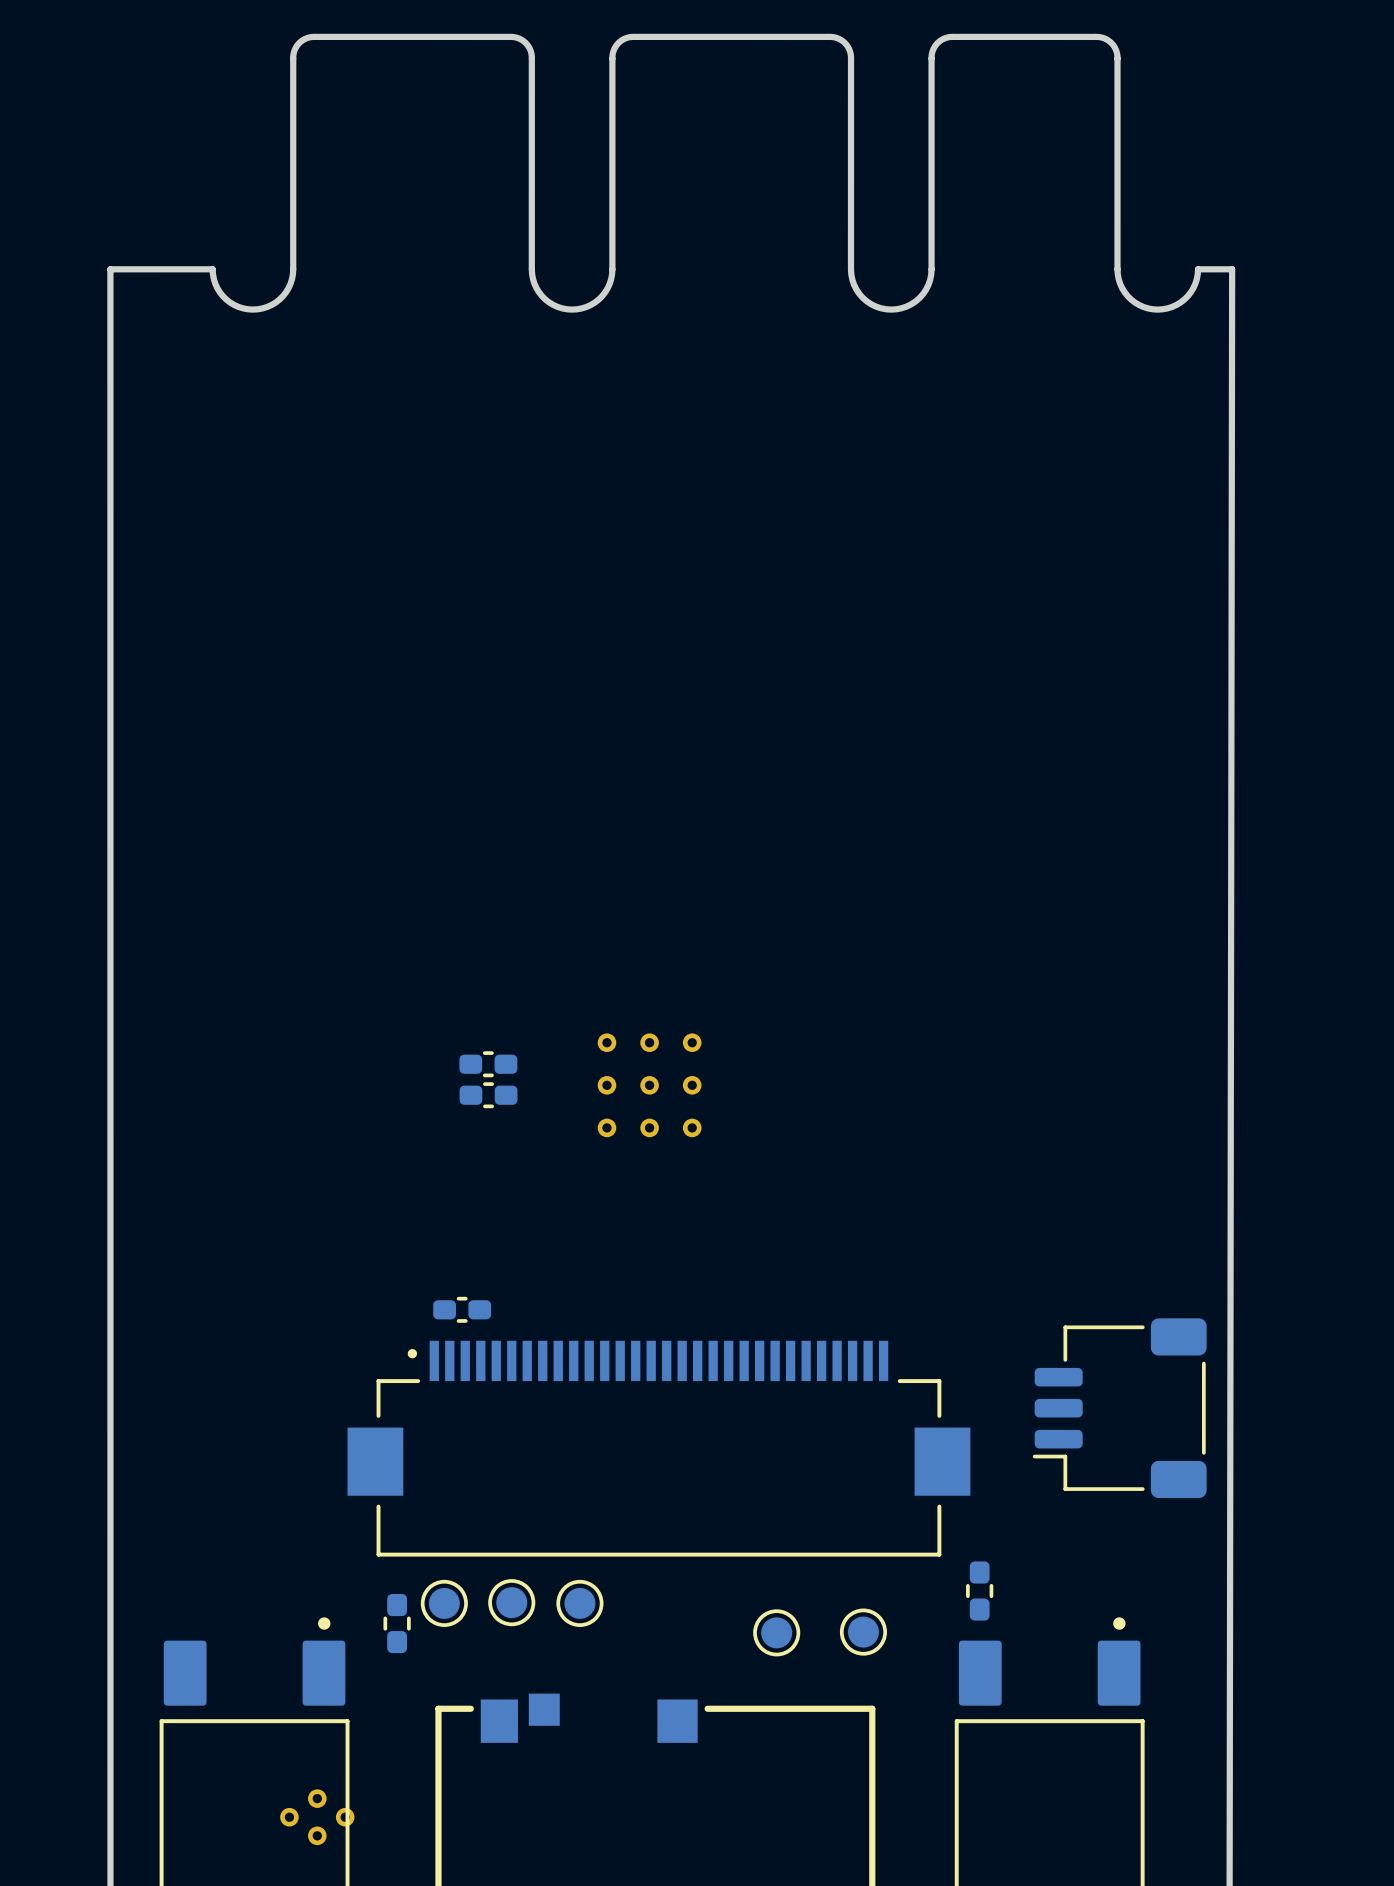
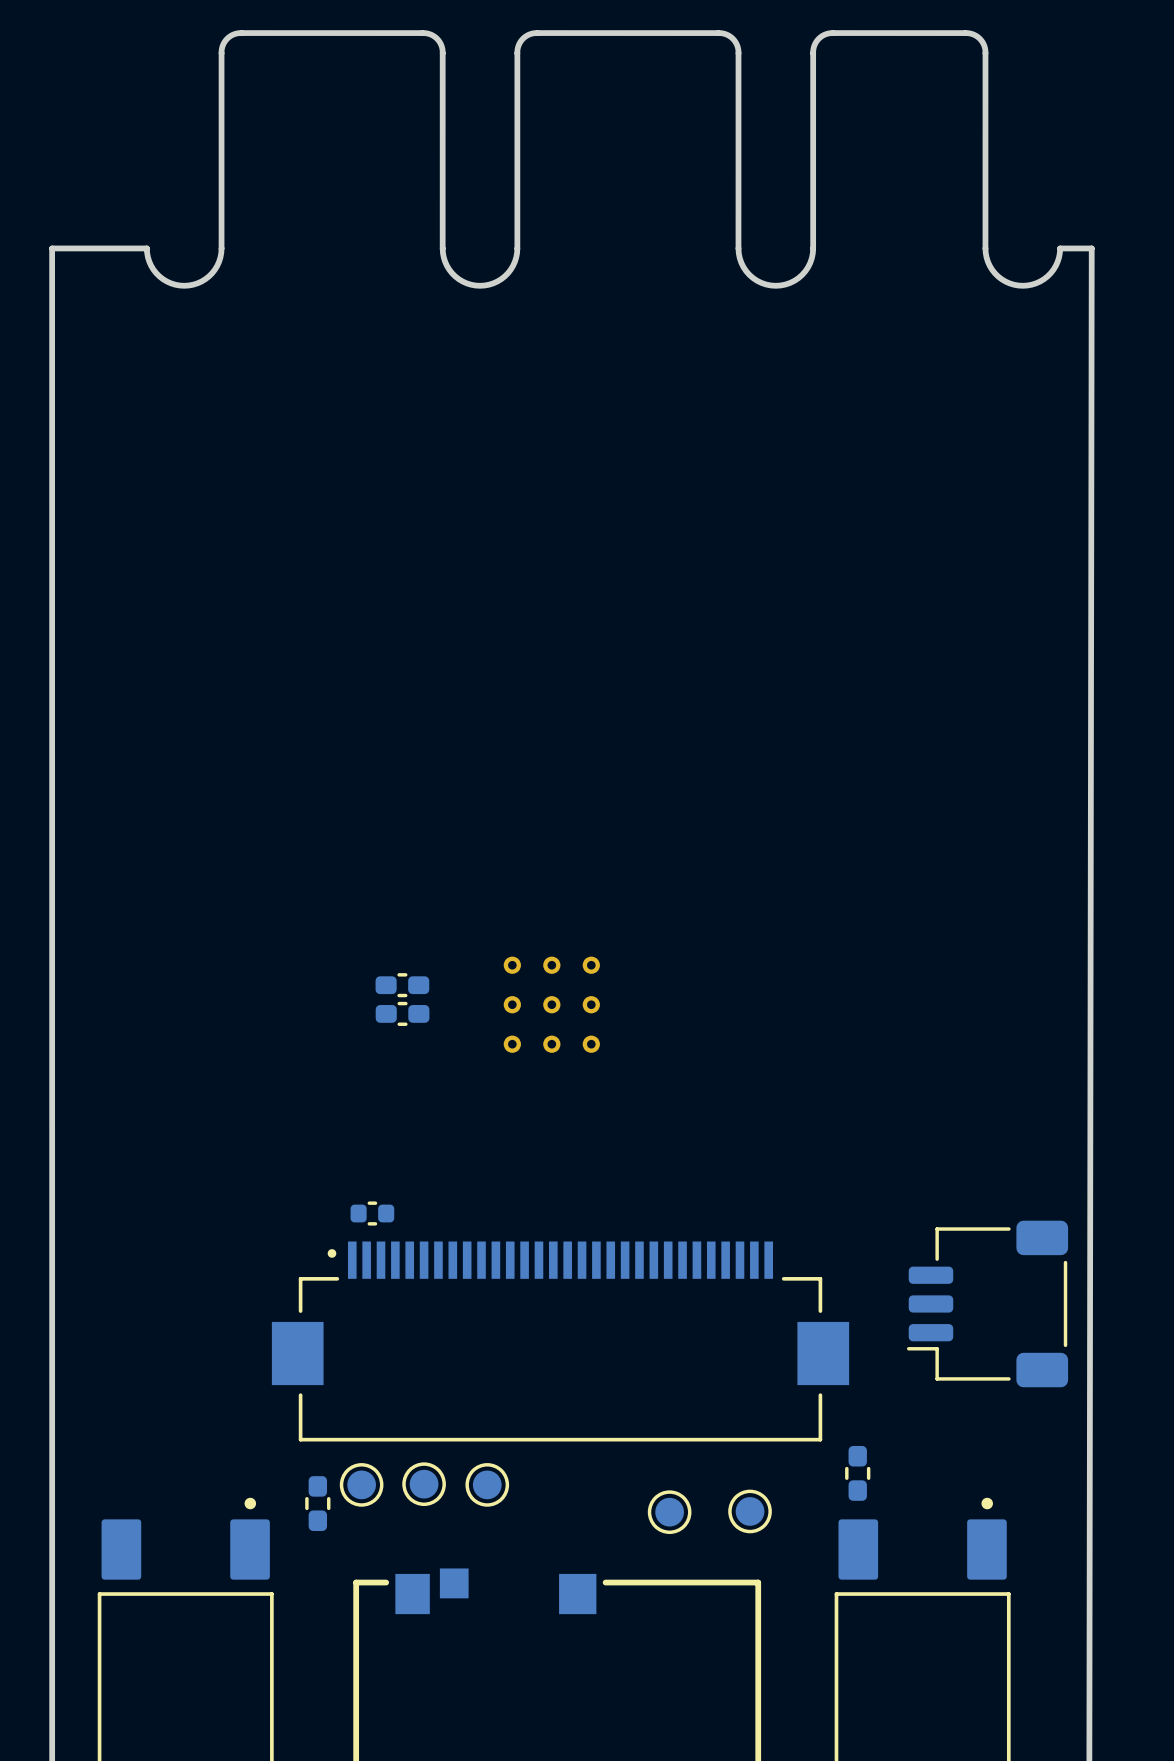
part footprint: [433, 1296, 492, 1323] -> [350, 1201, 395, 1226]
part: (317, 1817) -> none

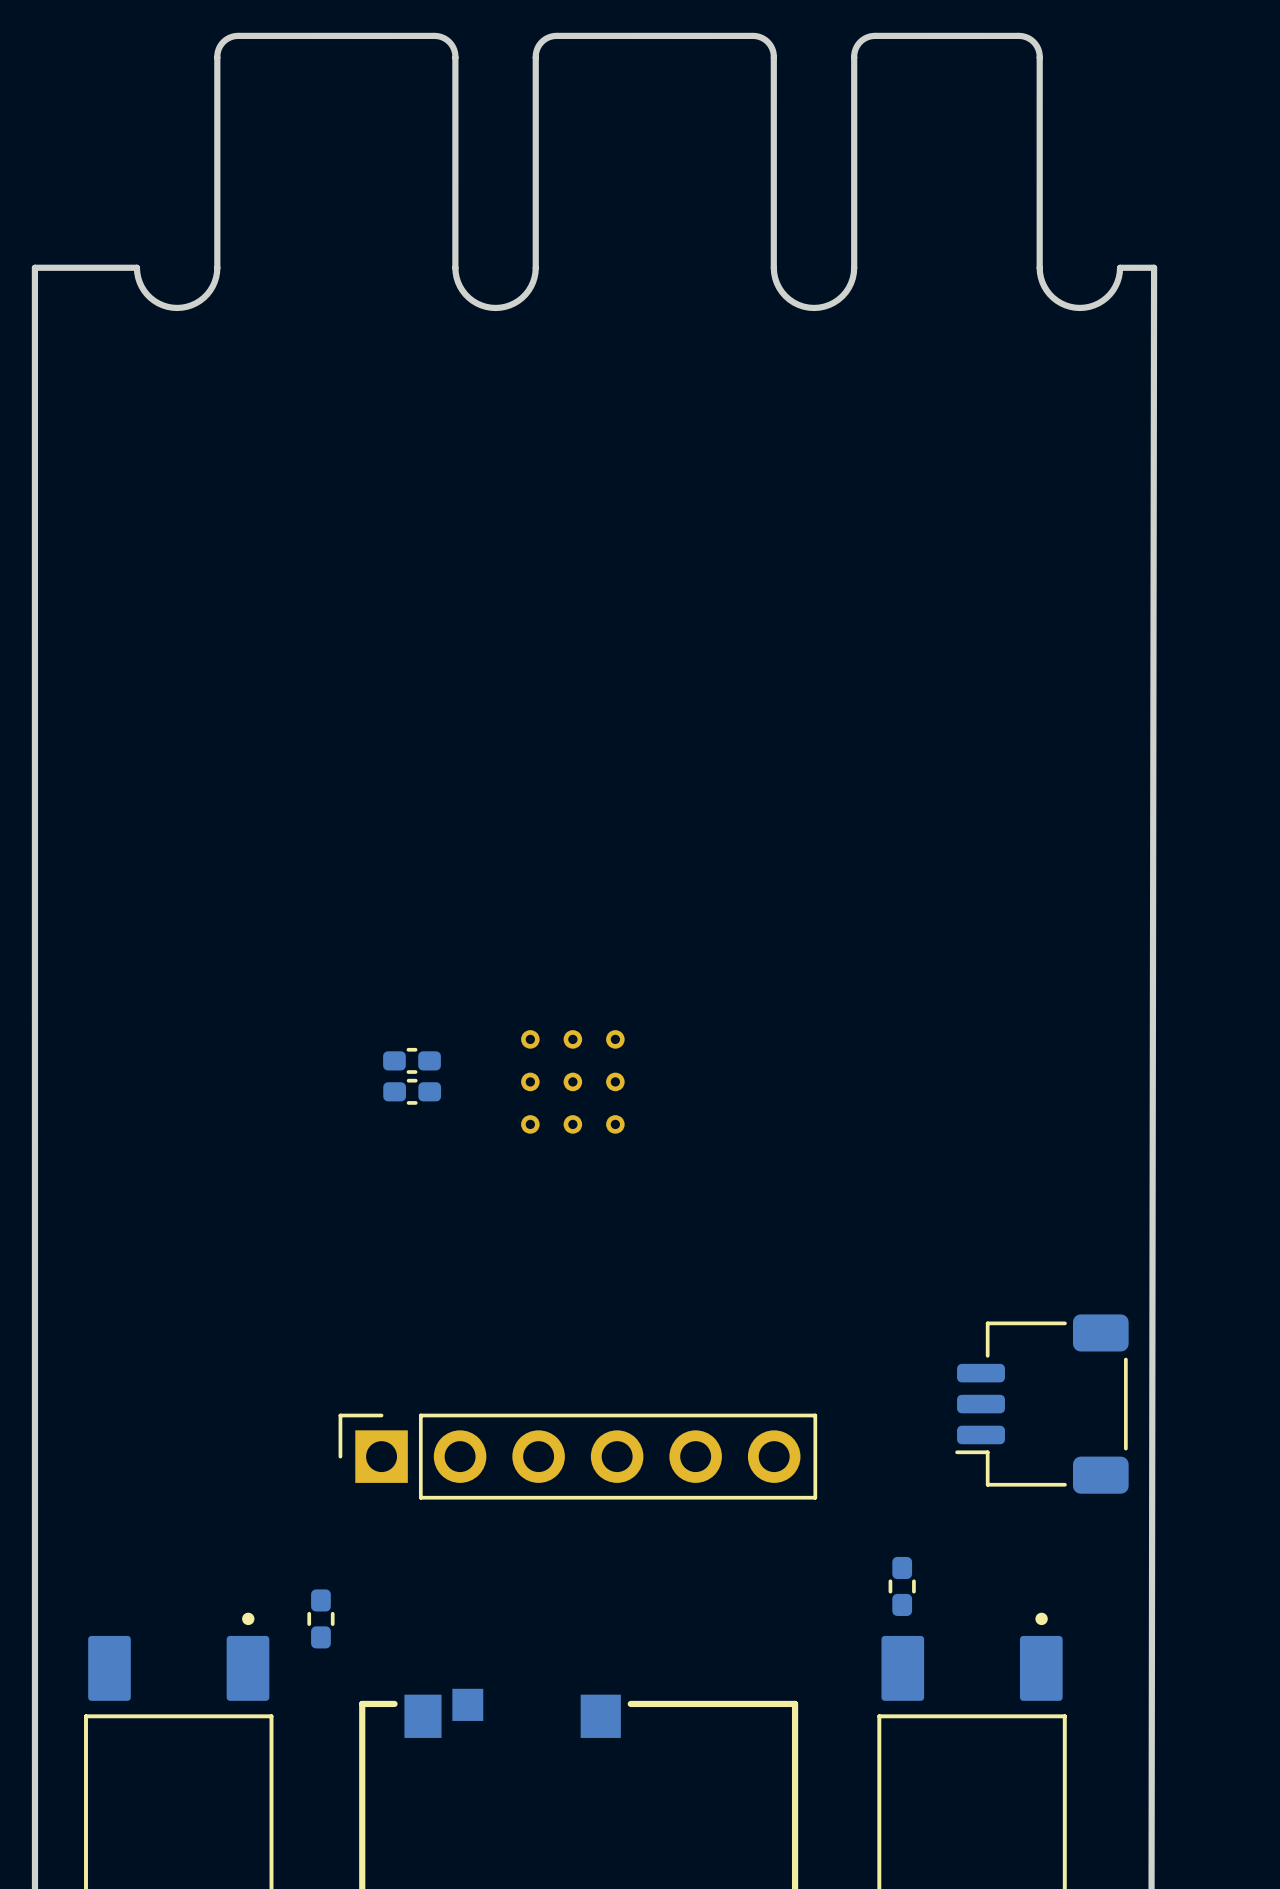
part: (372, 1213) -> none
part footprint: [271, 1241, 850, 1442] -> [338, 1413, 818, 1500]
part: (361, 1484) -> none
part: (424, 1484) -> none
part: (487, 1484) -> none
part: (750, 1511) -> none
part: (669, 1512) -> none

